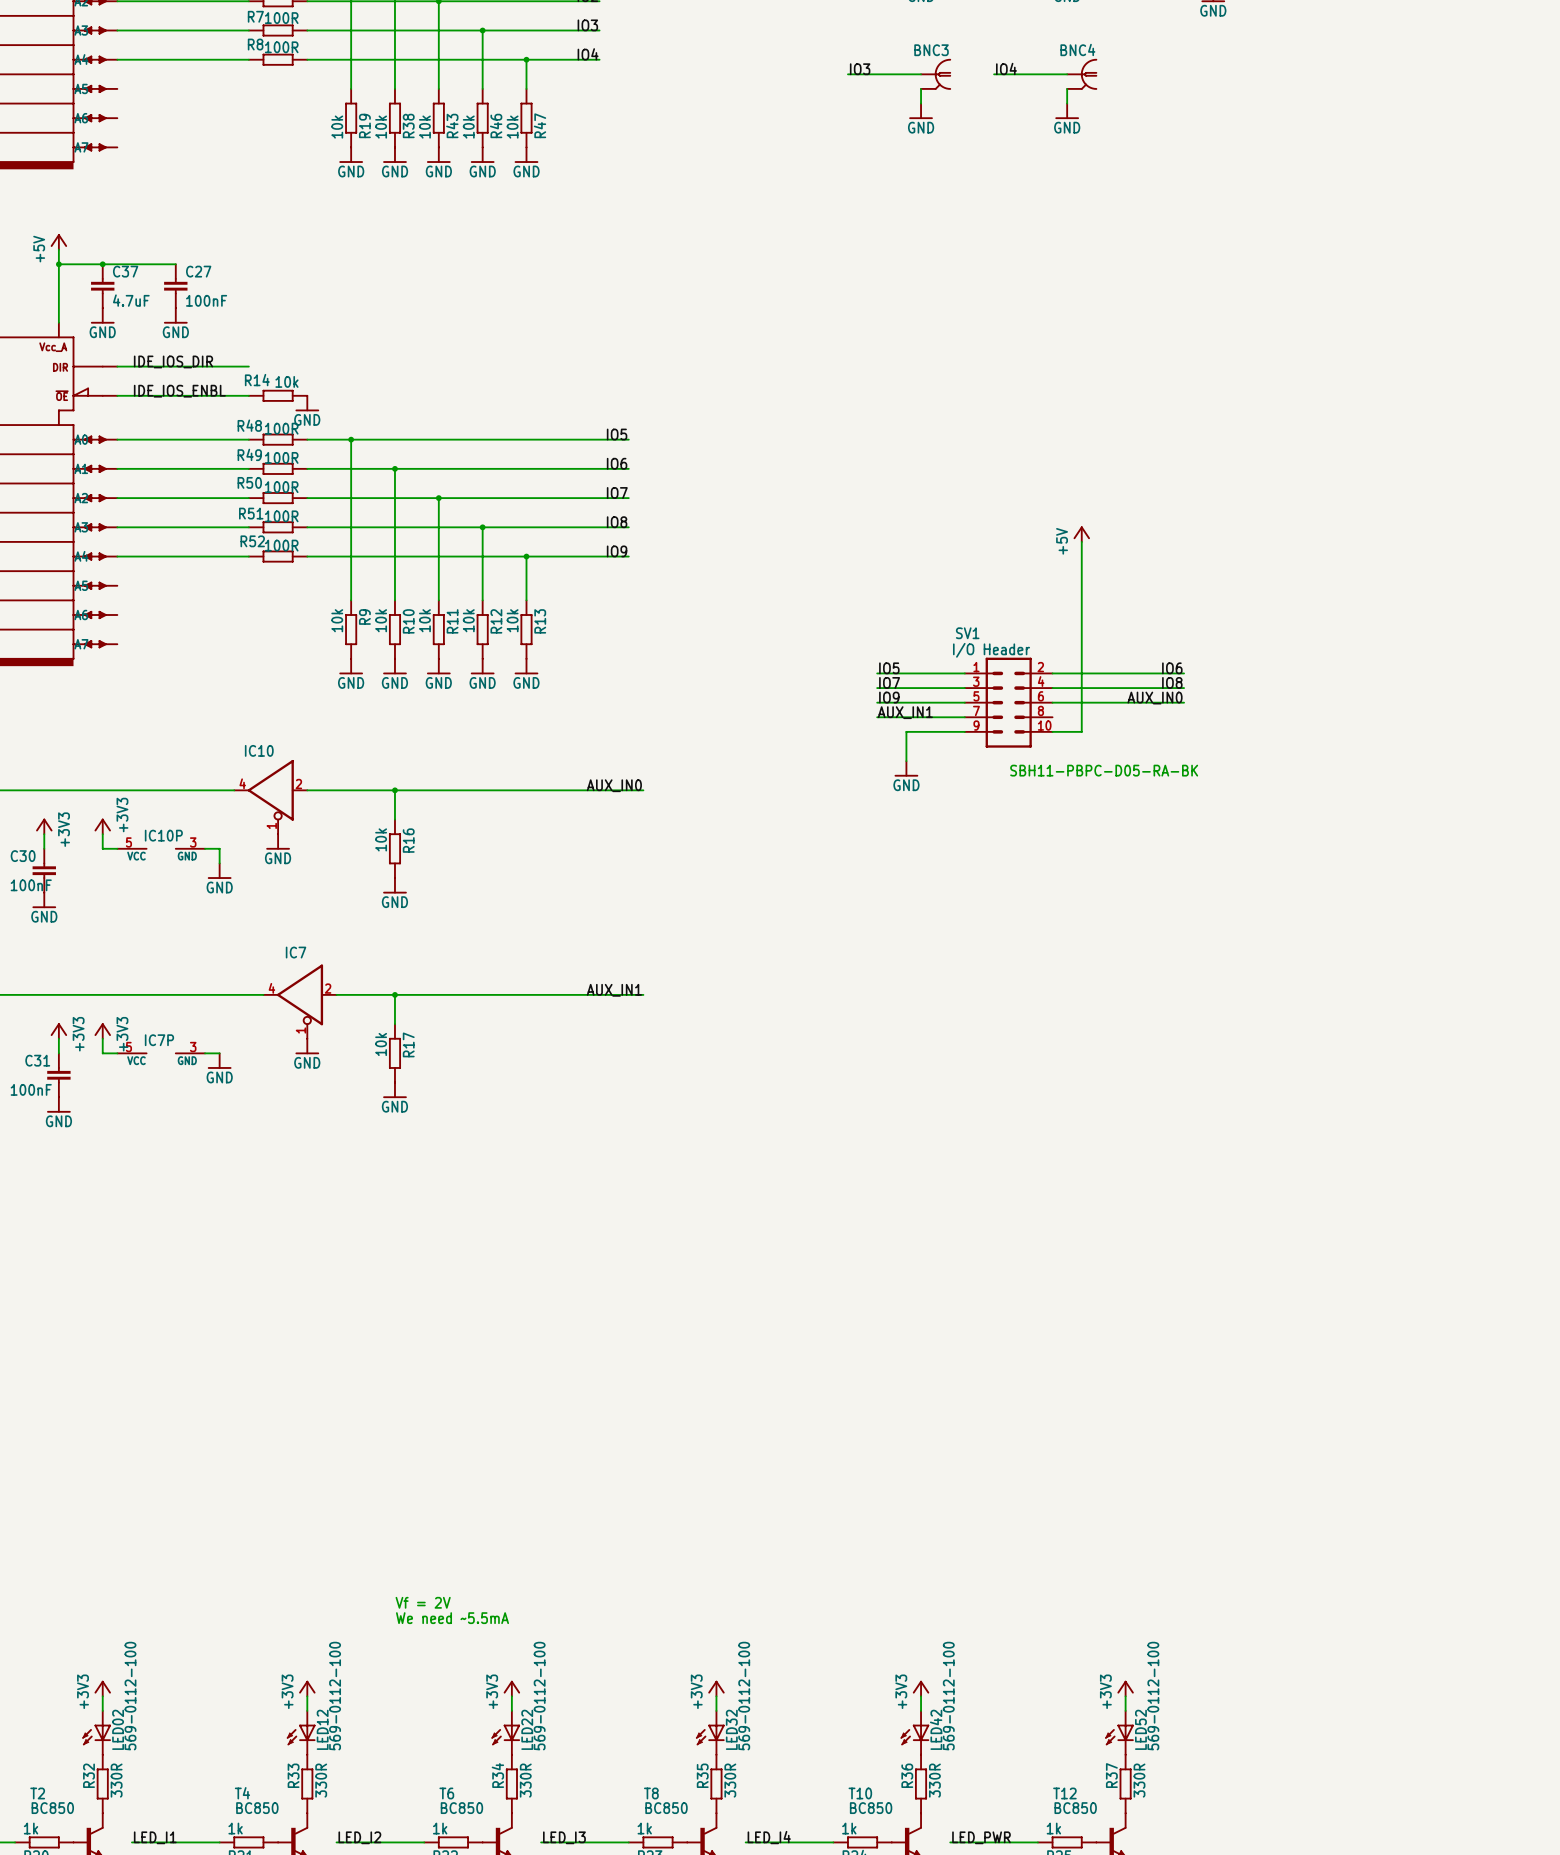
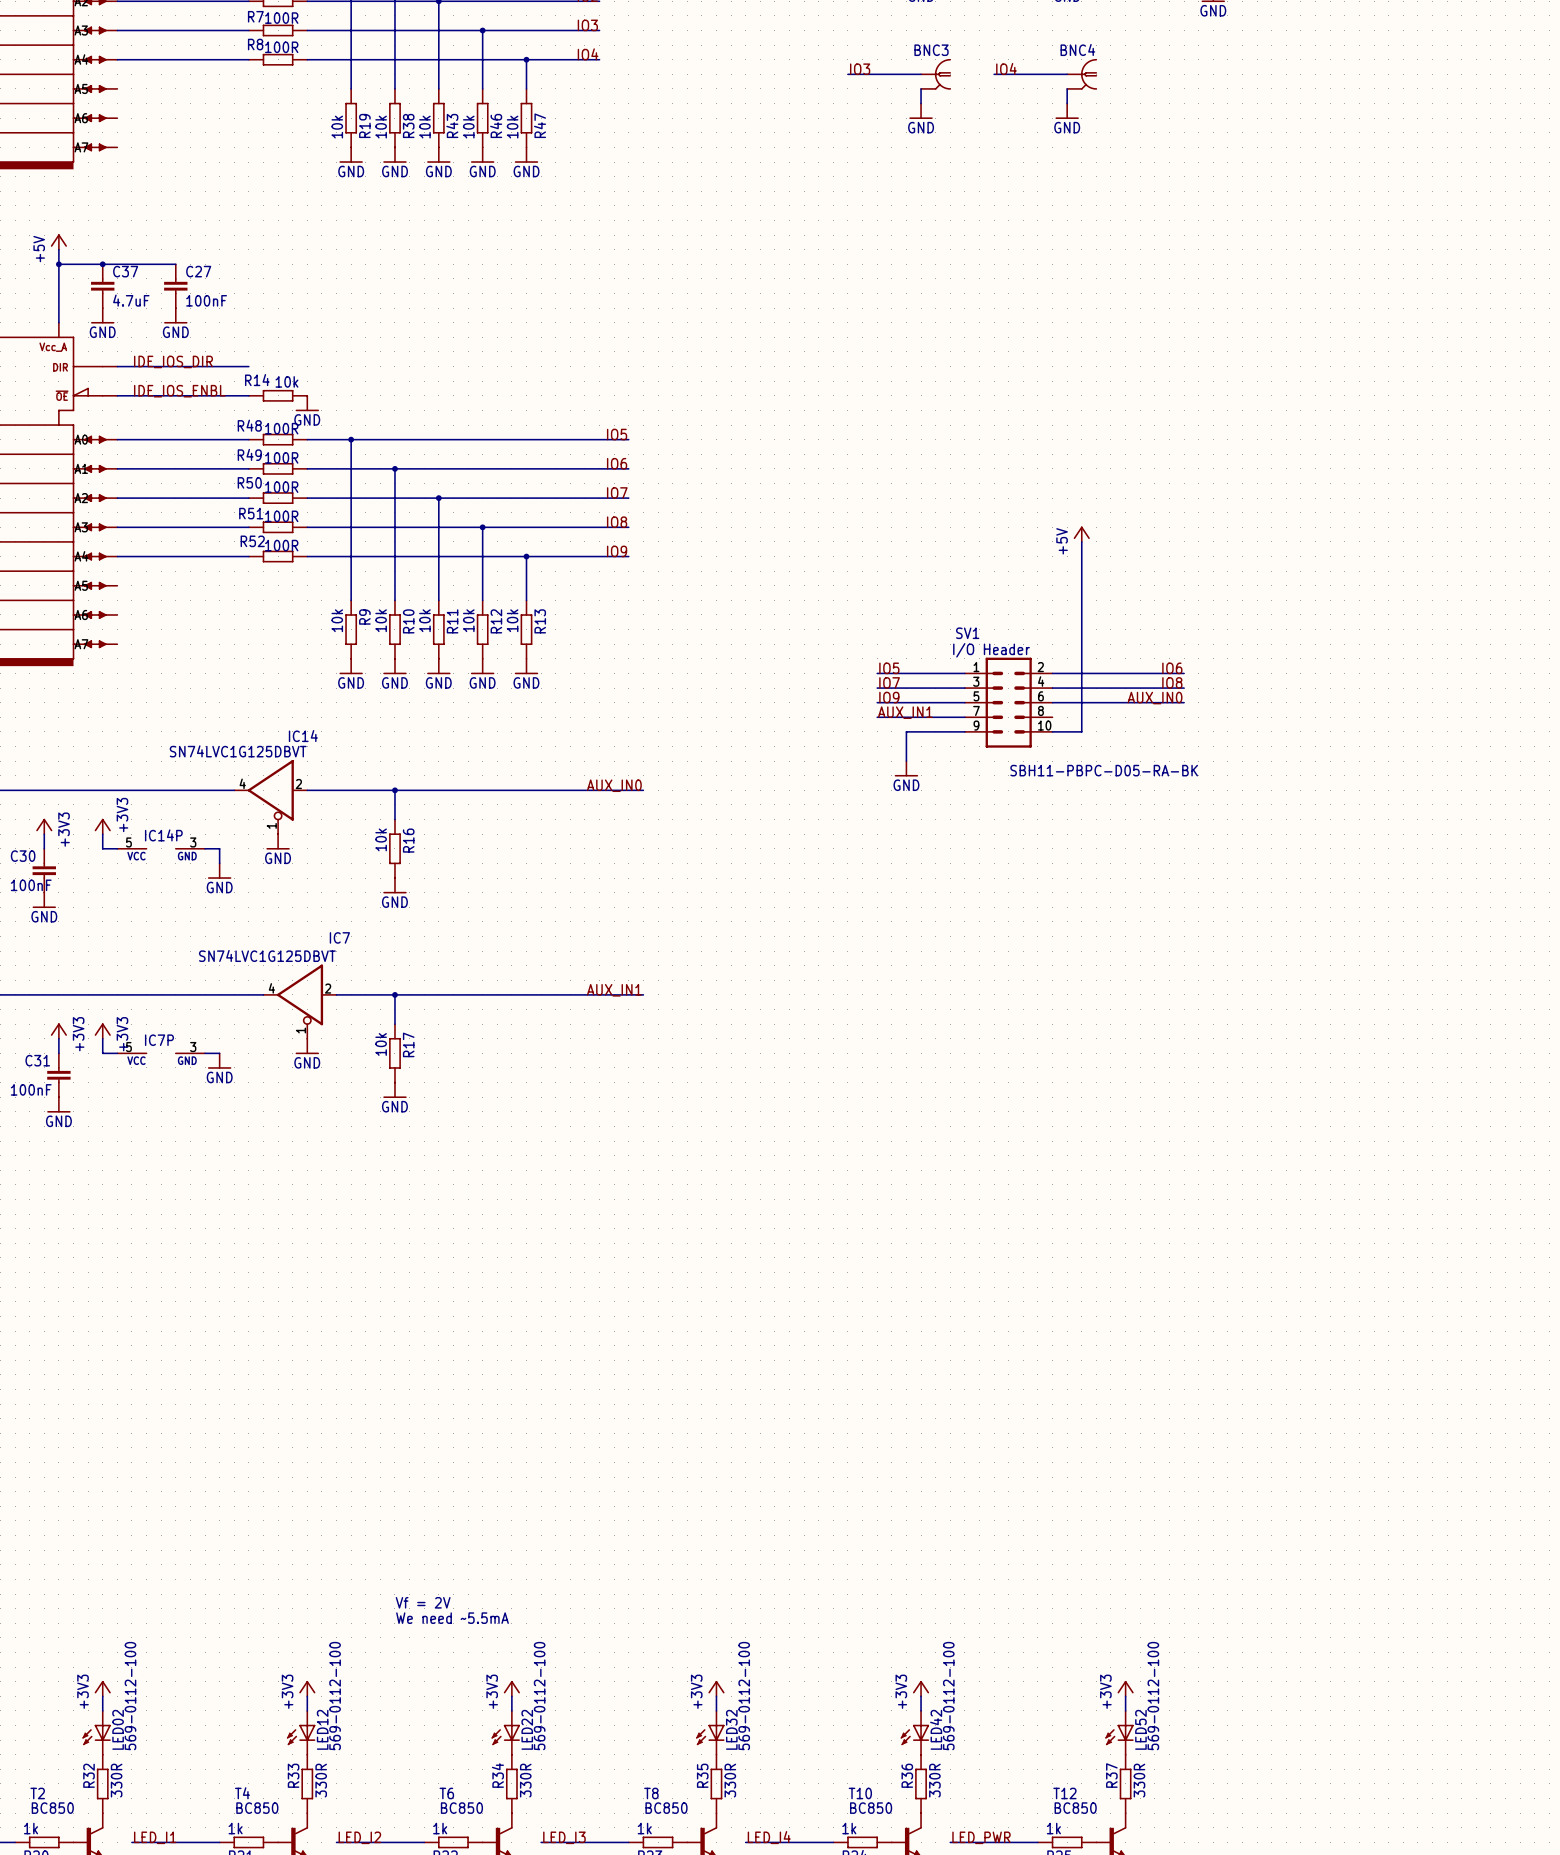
IC10 name: IC10 (259, 750) -> IC14 (303, 736)
IC10 value: none -> SN74LVC1G125DBVT (238, 751)
IC10P name: IC10P (163, 835) -> IC14P (163, 835)
IC7 name position: IC7 (296, 952) -> IC7 (339, 937)
IC7 value: none -> SN74LVC1G125DBVT (267, 955)

